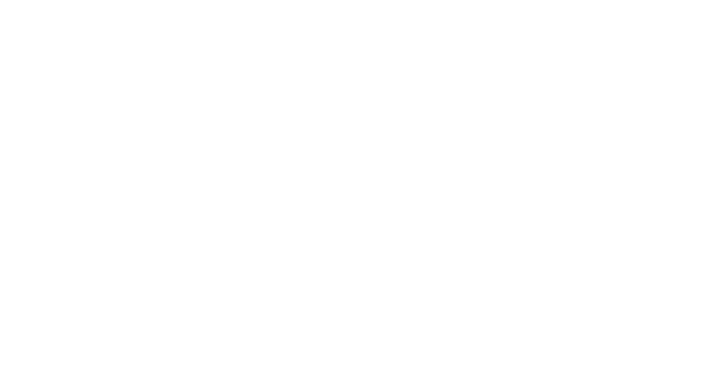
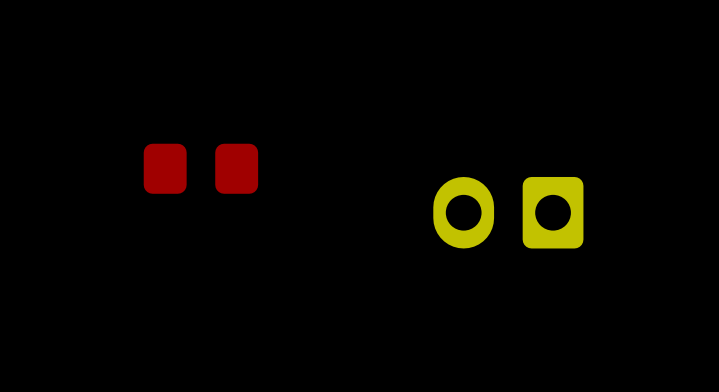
part: none -> (200, 168)
part: none -> (508, 212)

